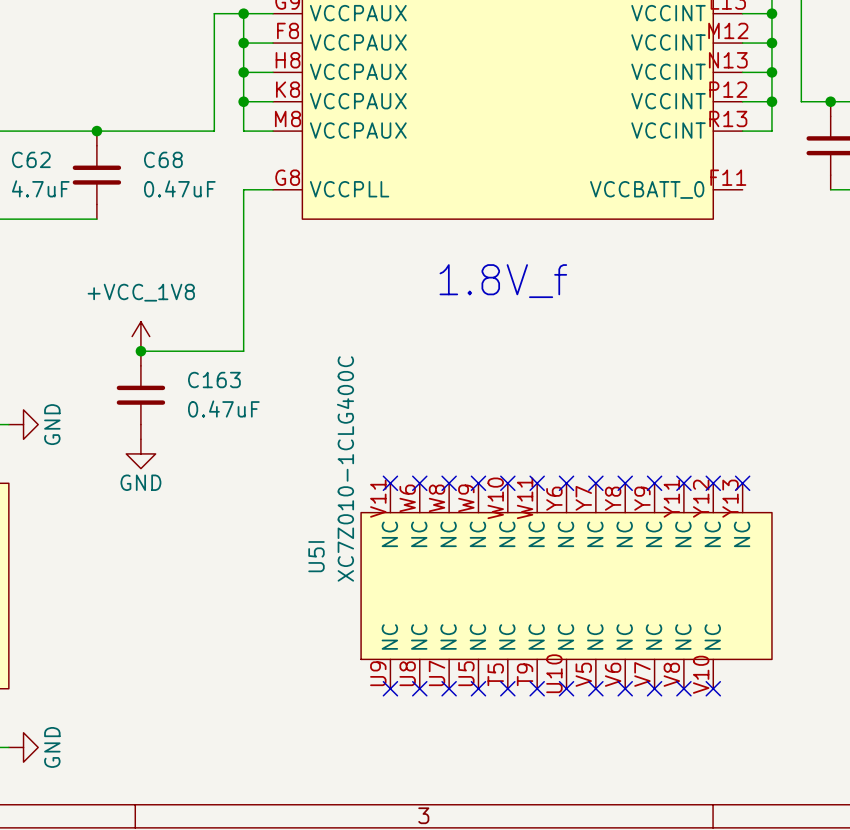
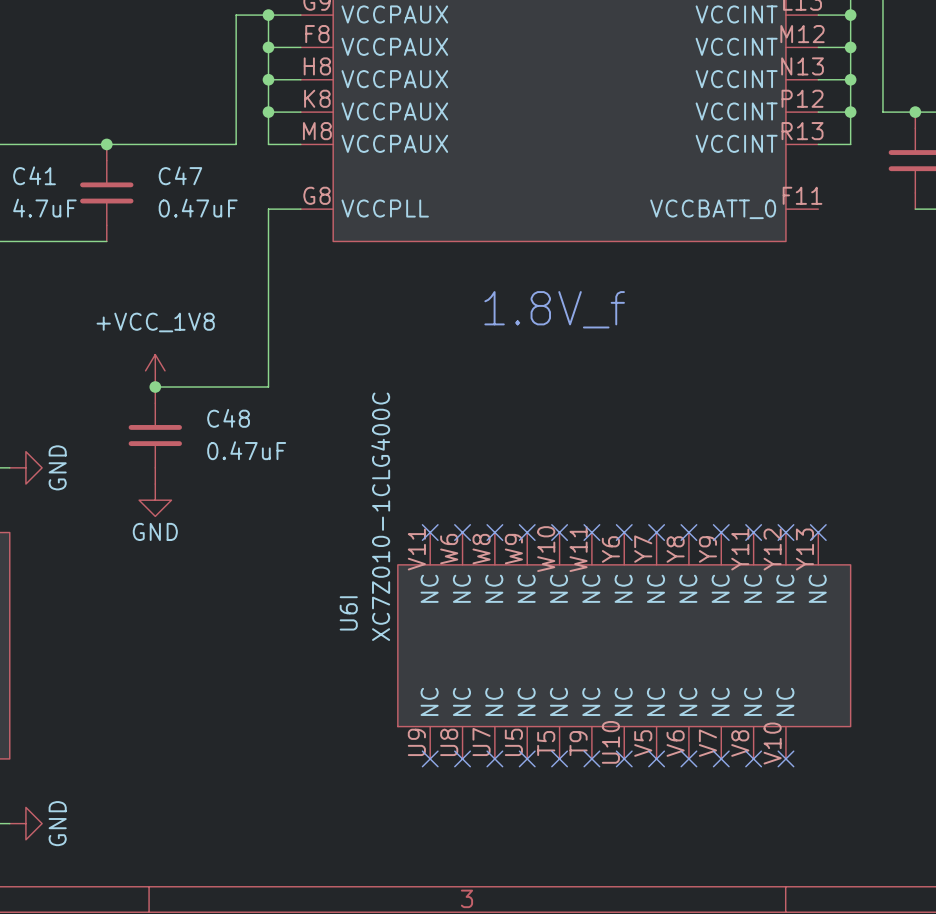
C62 name: C62 (31, 159) -> C41 (34, 175)
C68 name: C68 (163, 159) -> C47 (180, 175)
C163 name: C163 (214, 380) -> C48 (228, 418)
U5I name: U5I (316, 556) -> U6I (348, 613)

